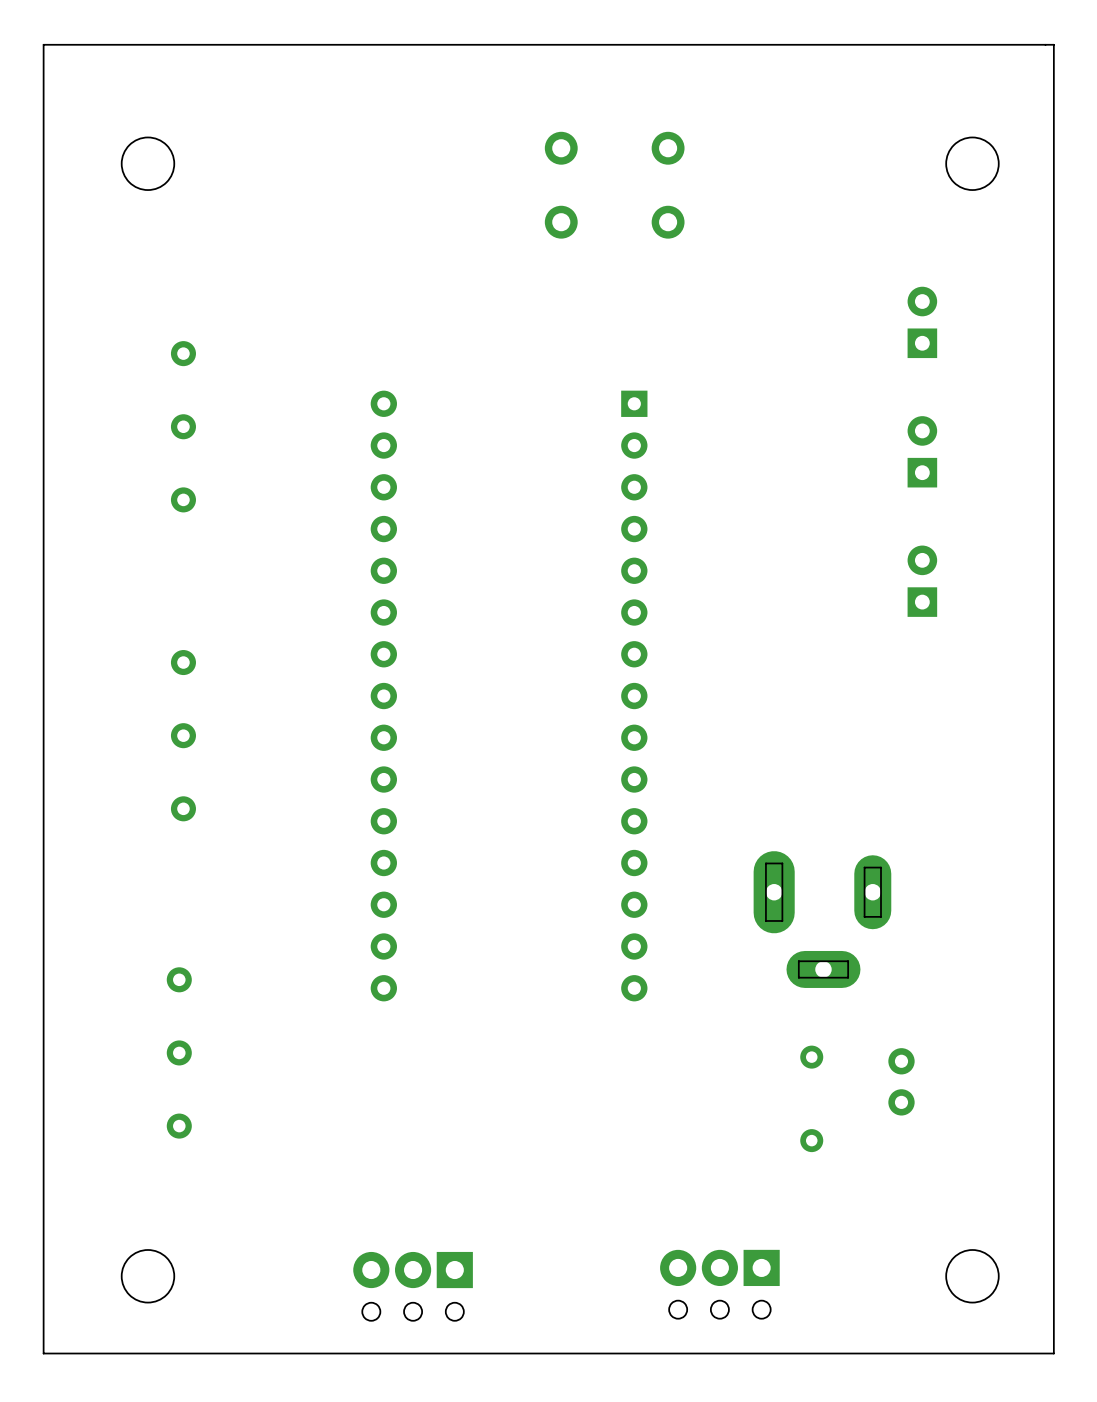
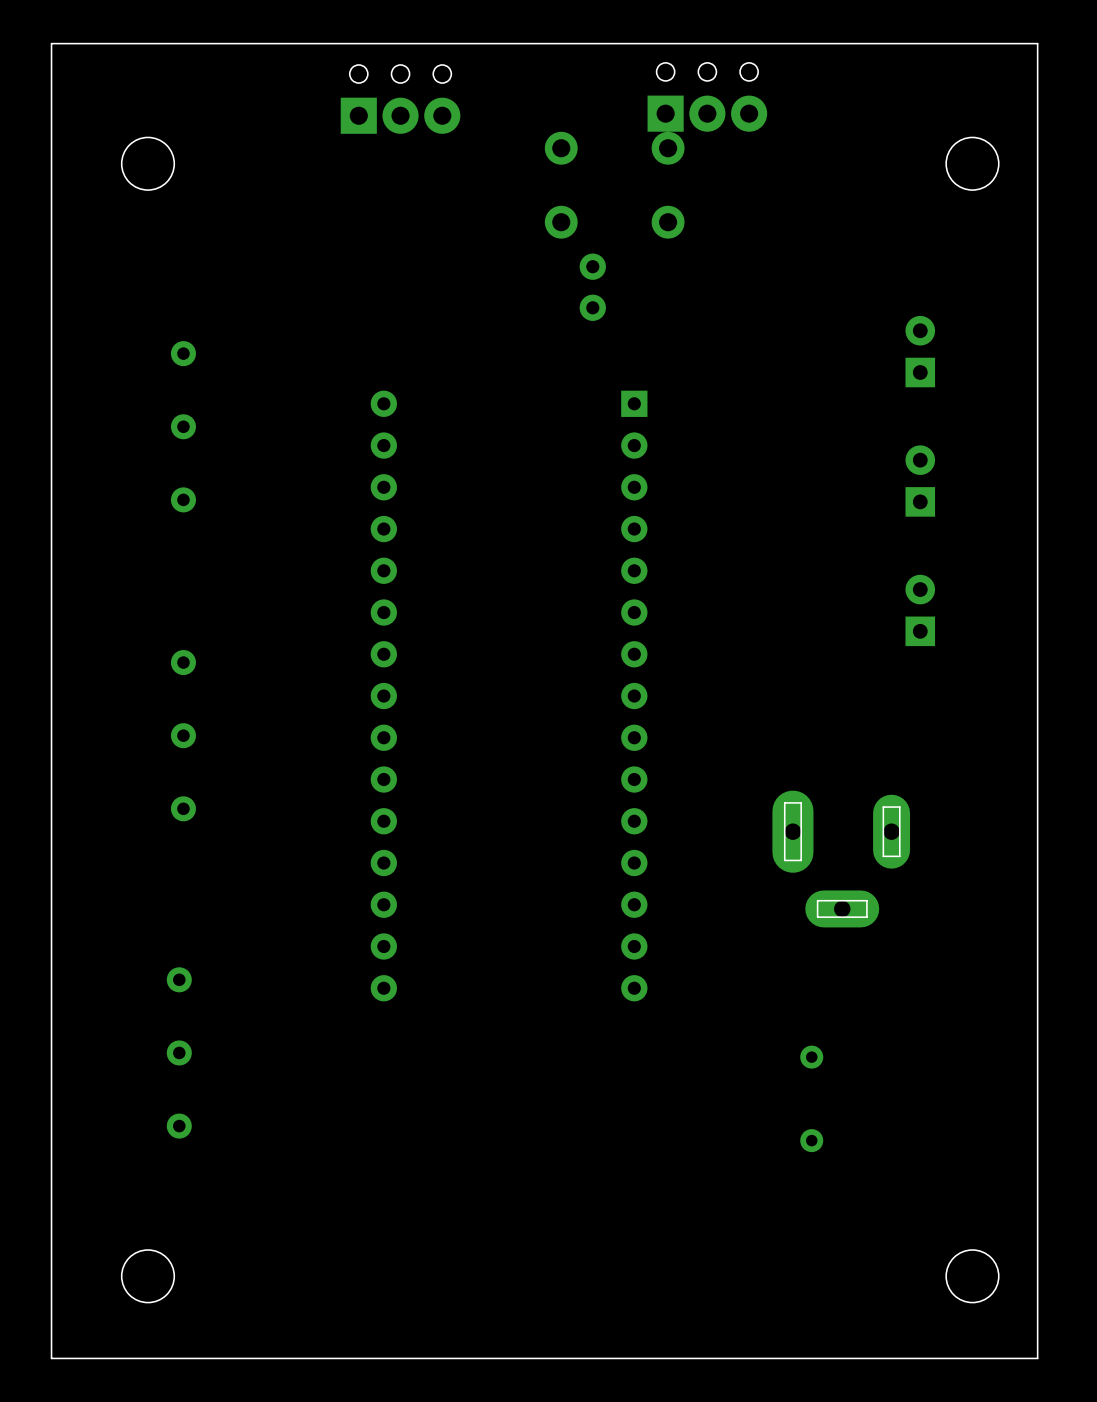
board edge: (1053, 44) (43, 44) (43, 1353) (1053, 1353) (1053, 44) -> (1037, 43) (1037, 1358) (51, 1358) (51, 43) (1037, 43)
part: none -> (707, 97)
part: none -> (400, 99)
part: none -> (592, 287)
part position: (922, 322) -> (920, 351)
part position: (922, 451) -> (920, 481)
part position: (922, 581) -> (920, 610)
part position: (822, 919) -> (841, 859)
part: (901, 1081) -> none
part: (719, 1284) -> none
part: (413, 1286) -> none

